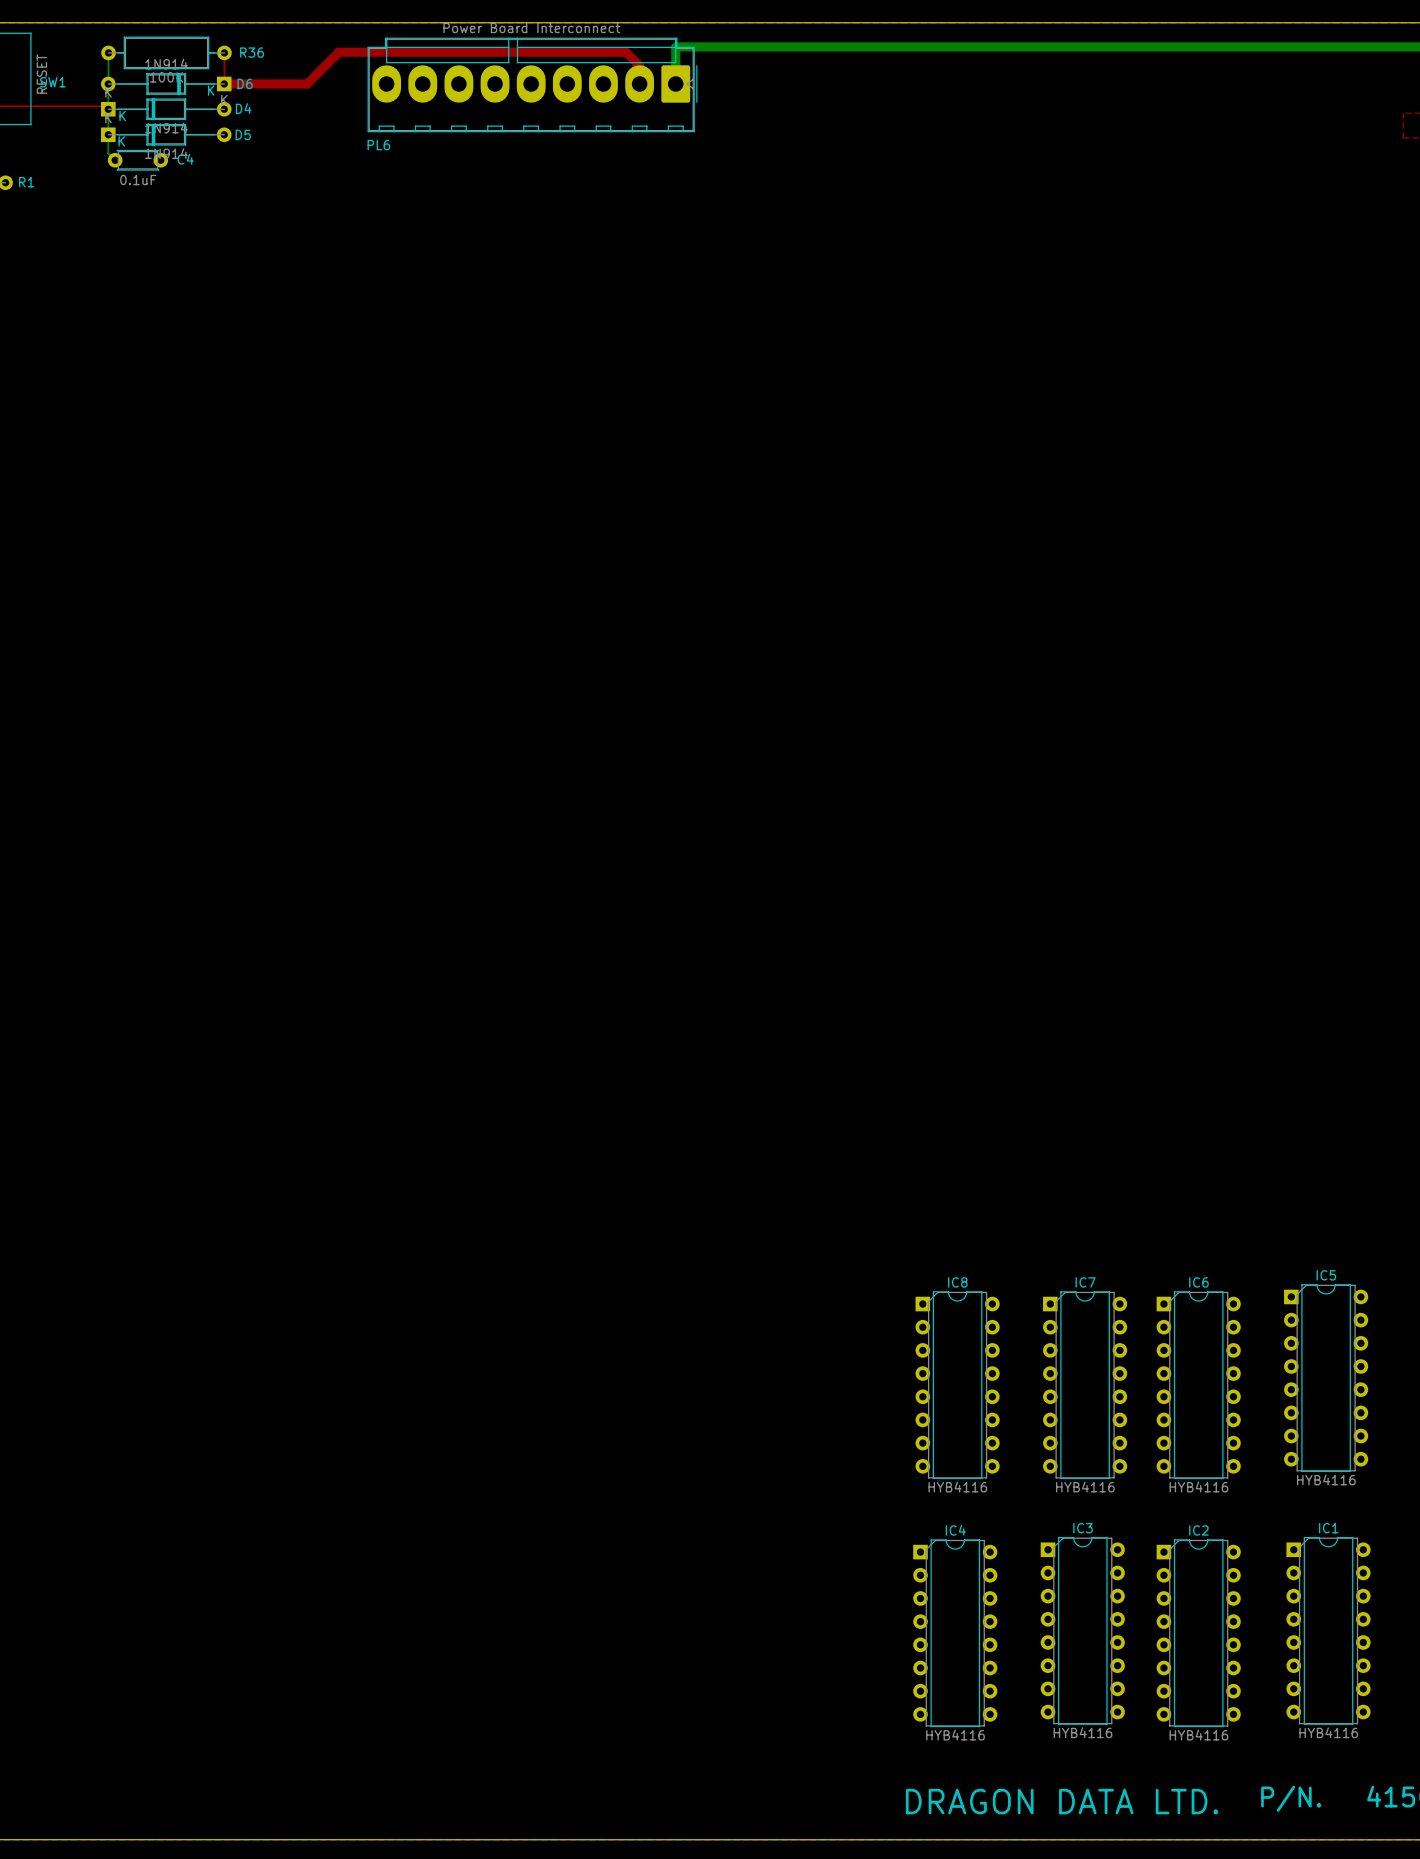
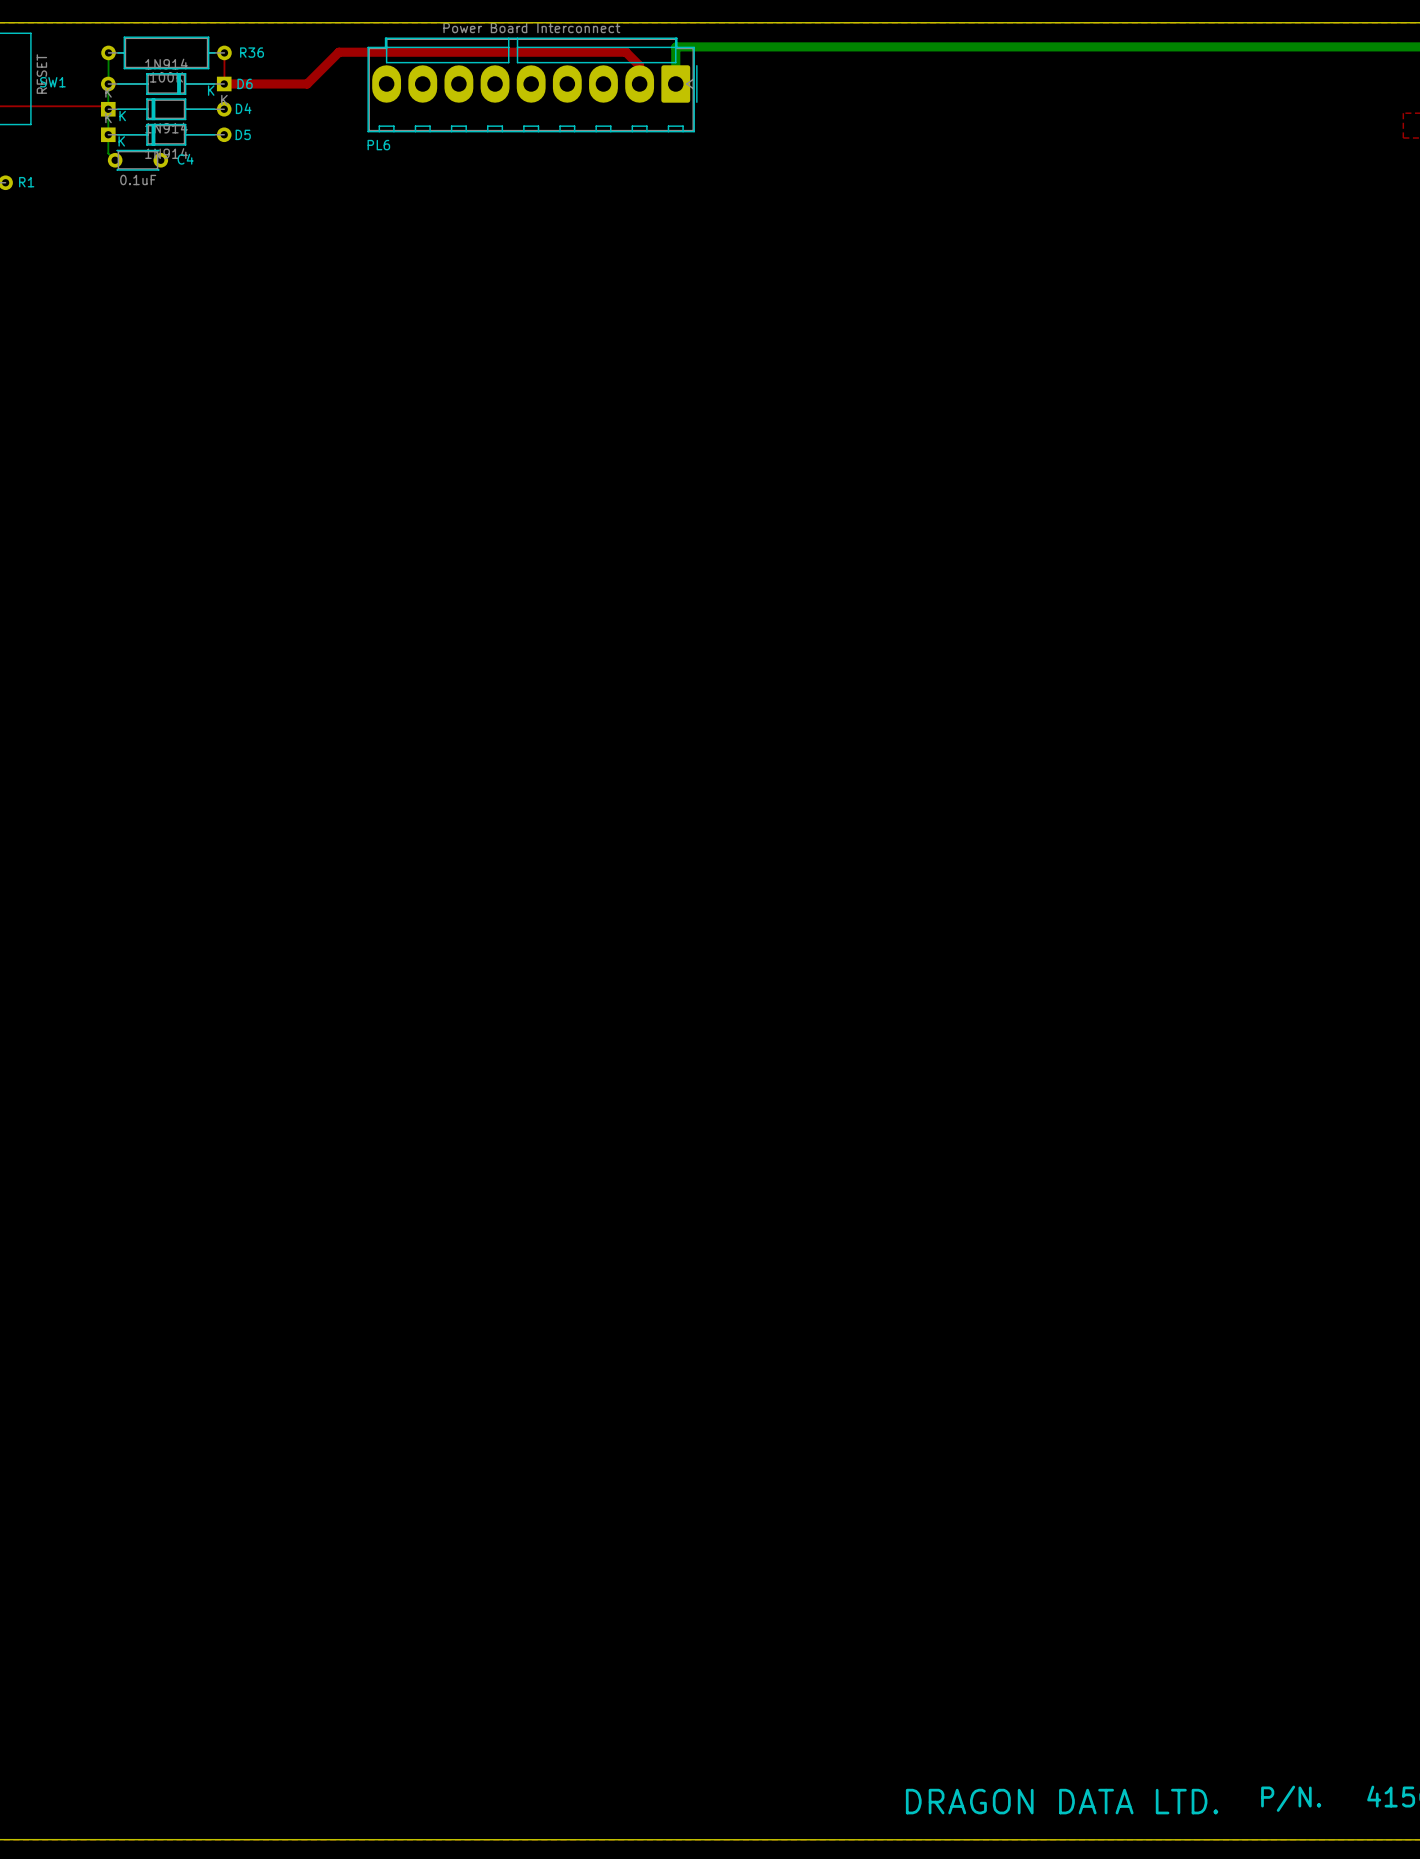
IC5: HYB4116 (1326, 1378) -> none
IC8: HYB4116 (957, 1385) -> none
IC7: HYB4116 (1085, 1385) -> none
IC6: HYB4116 (1198, 1385) -> none
IC3: HYB4116 (1082, 1630) -> none
IC1: HYB4116 (1328, 1630) -> none
IC4: HYB4116 (955, 1633) -> none
IC2: HYB4116 (1198, 1633) -> none

